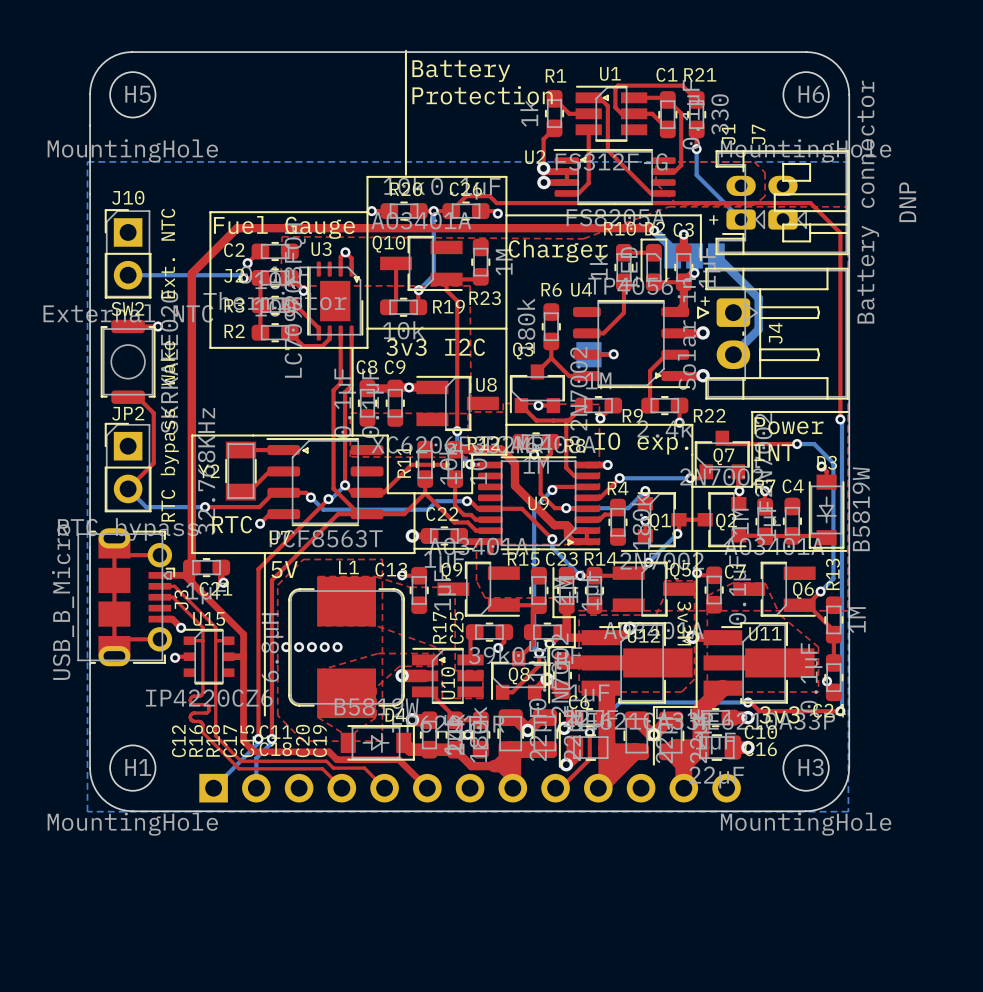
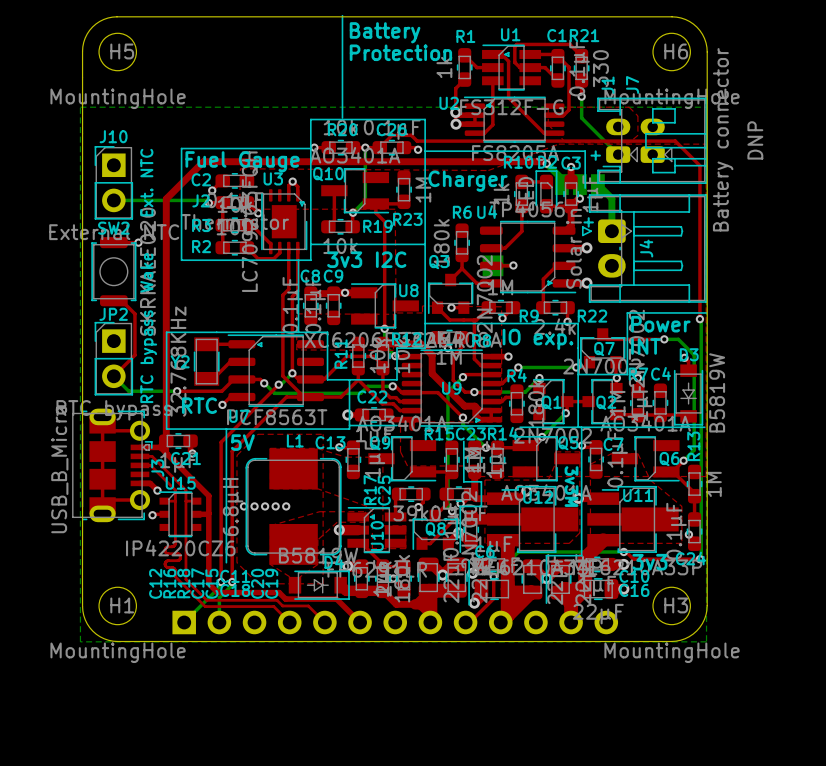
bottom track: (733, 272) (758, 298) (758, 329) (733, 354) -> (611, 198) (611, 231)

